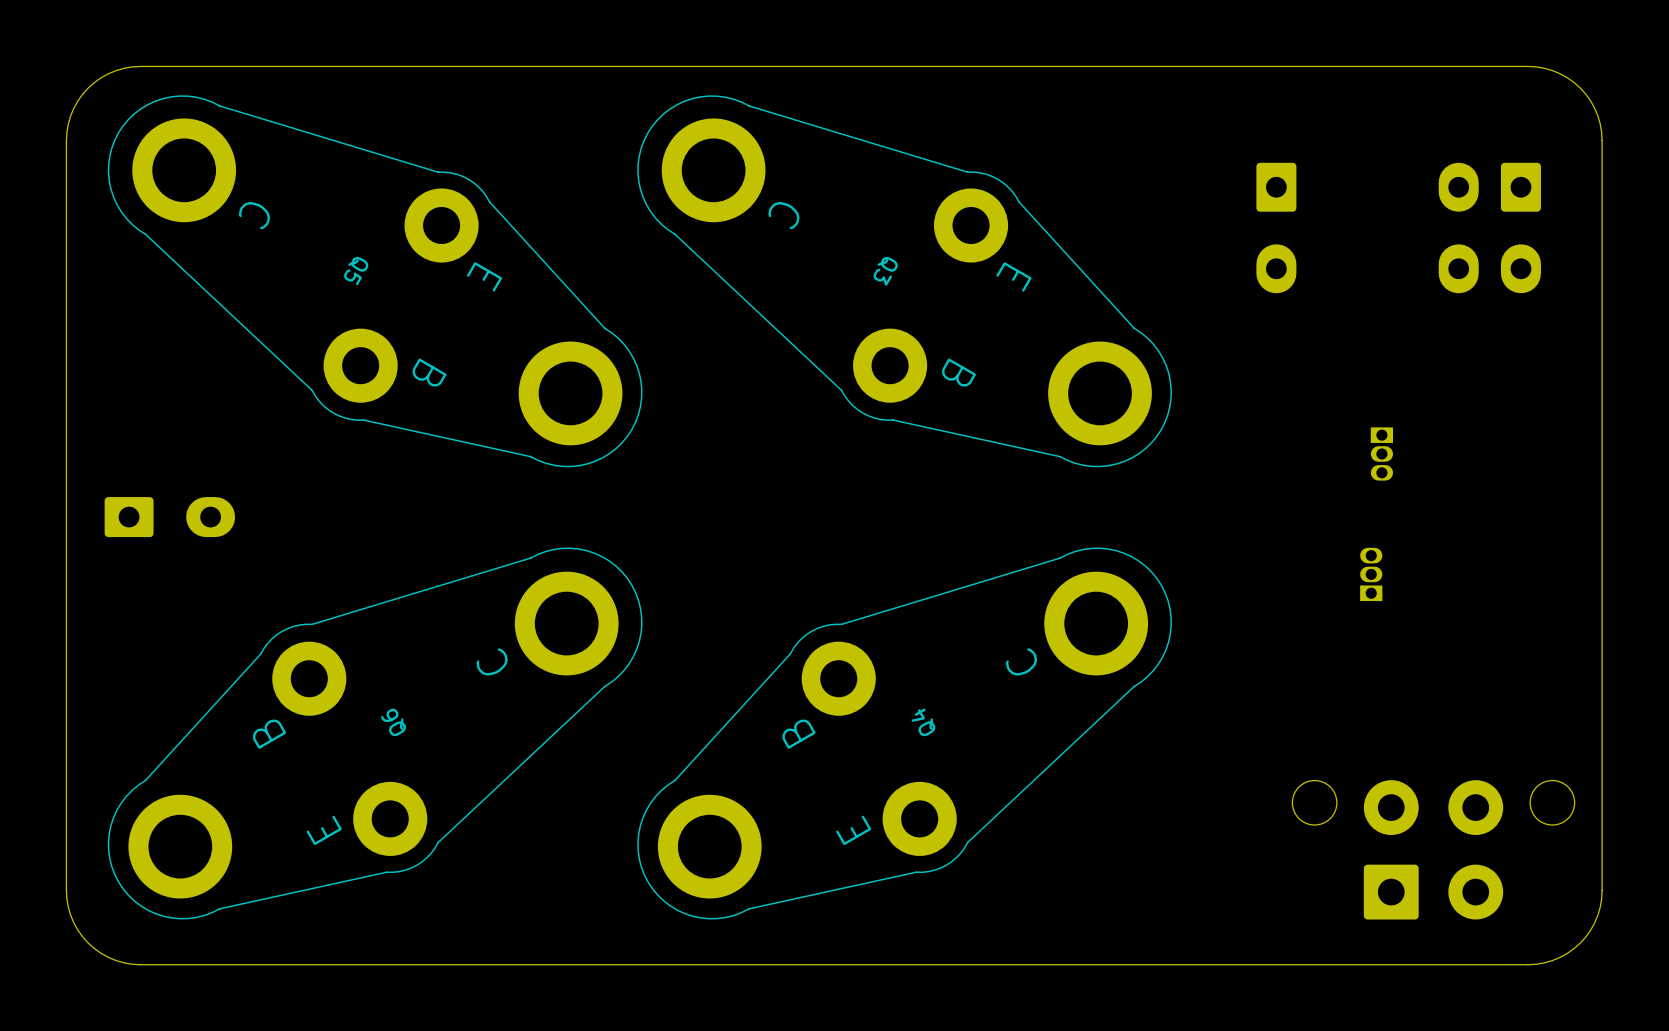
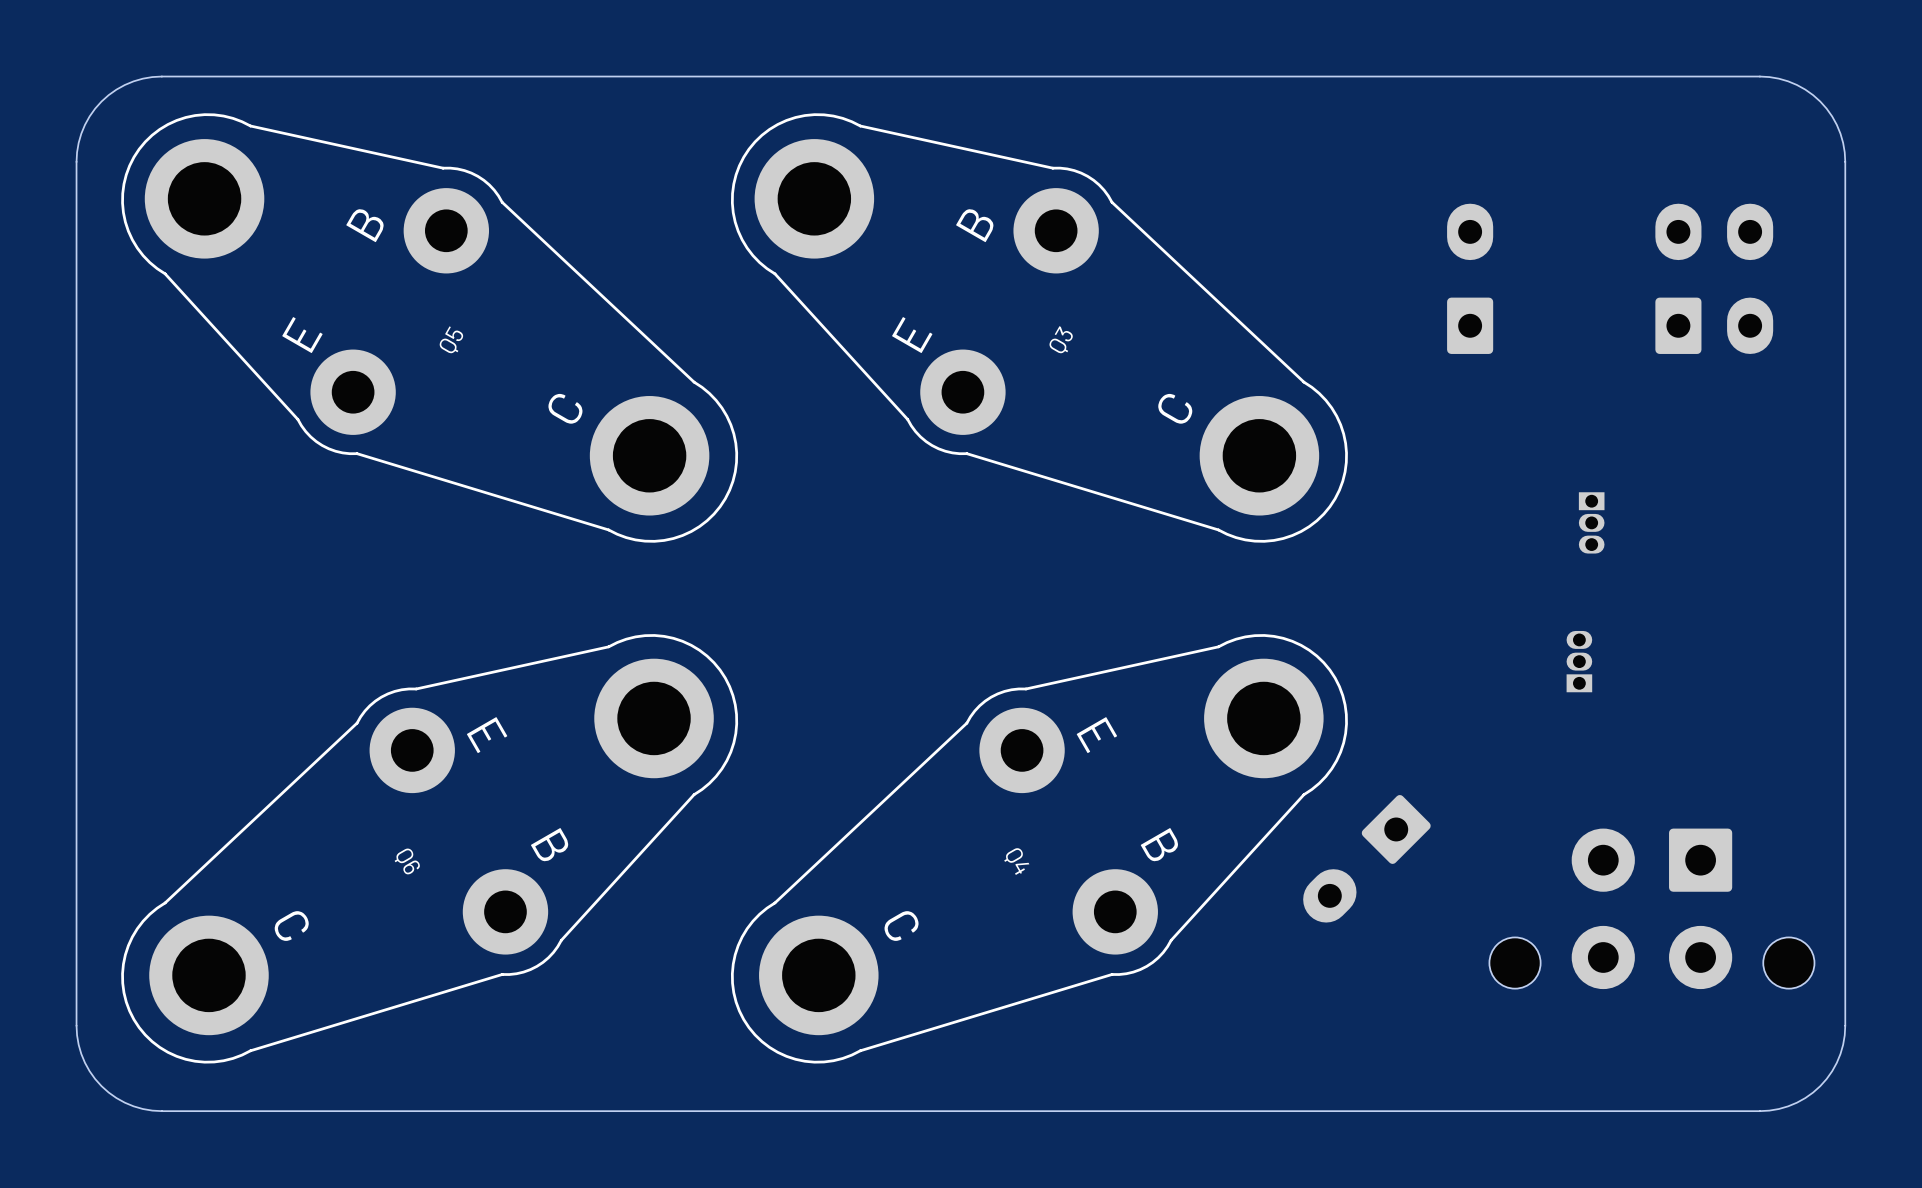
Q5 footprint: [107, 95, 643, 468] -> [121, 113, 739, 543]
Q3 footprint: [637, 95, 1172, 468] -> [730, 113, 1348, 543]
part rotation: 0° (1276, 228) -> 180° (1470, 278)
part rotation: 0° (1489, 228) -> 180° (1714, 278)
Q5 name position: Q5 (356, 270) -> Q5 (451, 339)
Q3 name position: Q3 (885, 271) -> Q3 (1061, 339)
part: (169, 517) -> none
Q6 footprint: [107, 547, 643, 920] -> [121, 634, 739, 1064]
Q4 footprint: [637, 547, 1172, 920] -> [730, 634, 1348, 1064]
Q6 name position: Q6 (393, 722) -> Q6 (407, 861)
Q4 name position: Q4 (923, 722) -> Q4 (1016, 861)
part: none -> (1366, 858)
part rotation: 0° (1433, 849) -> 180° (1651, 908)

